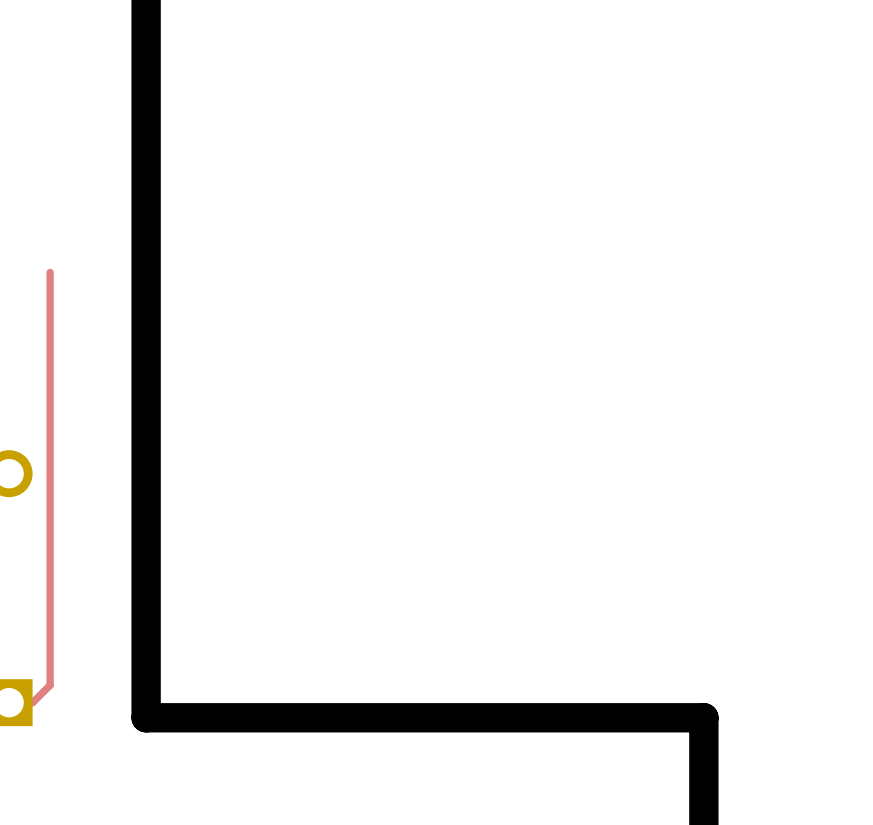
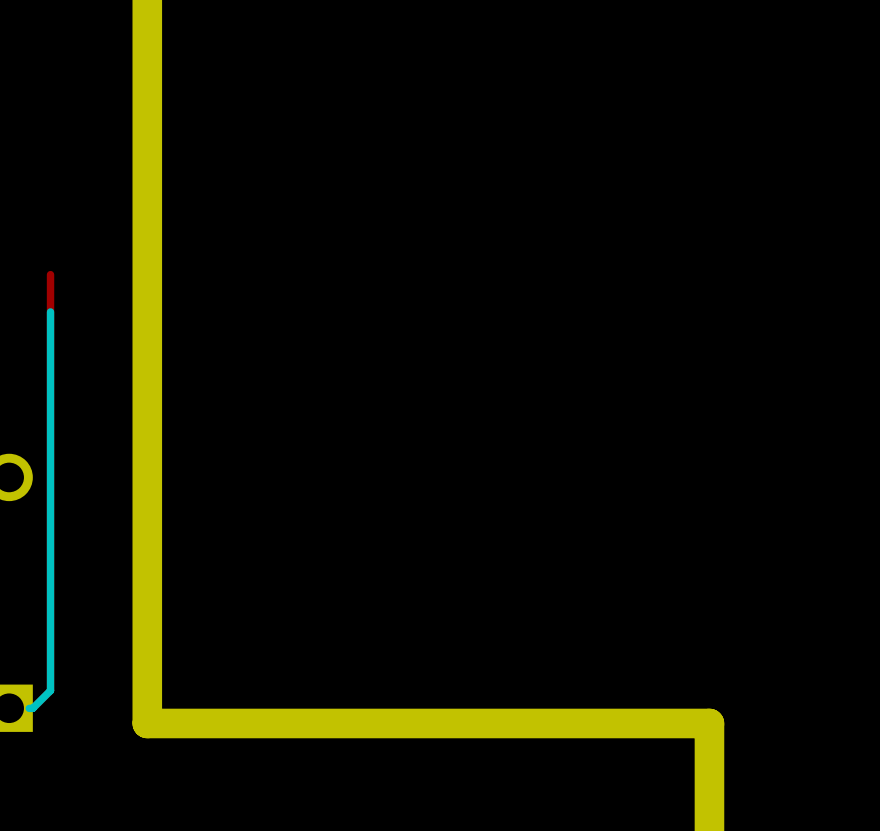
line: none -> (50, 311) (50, 690) (32, 708) (29, 708)

